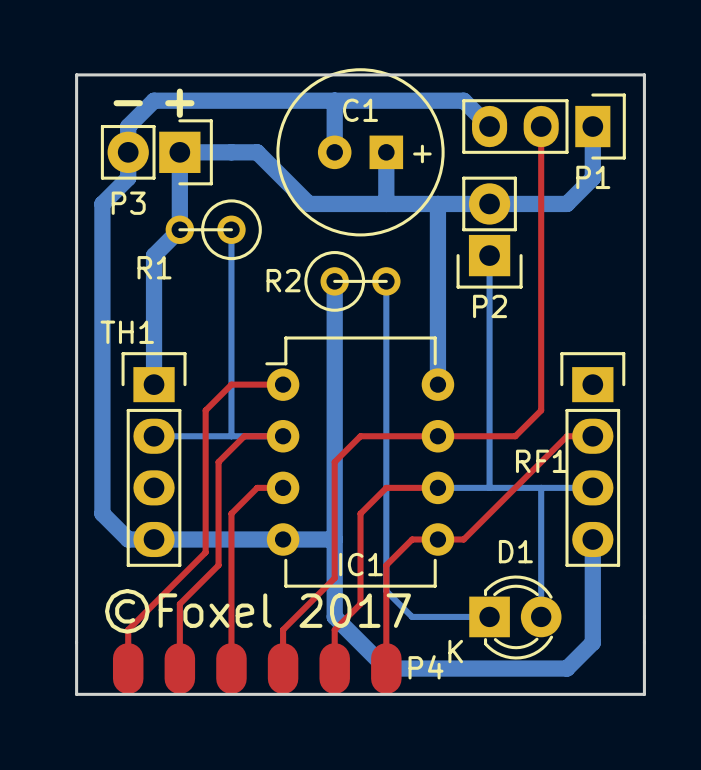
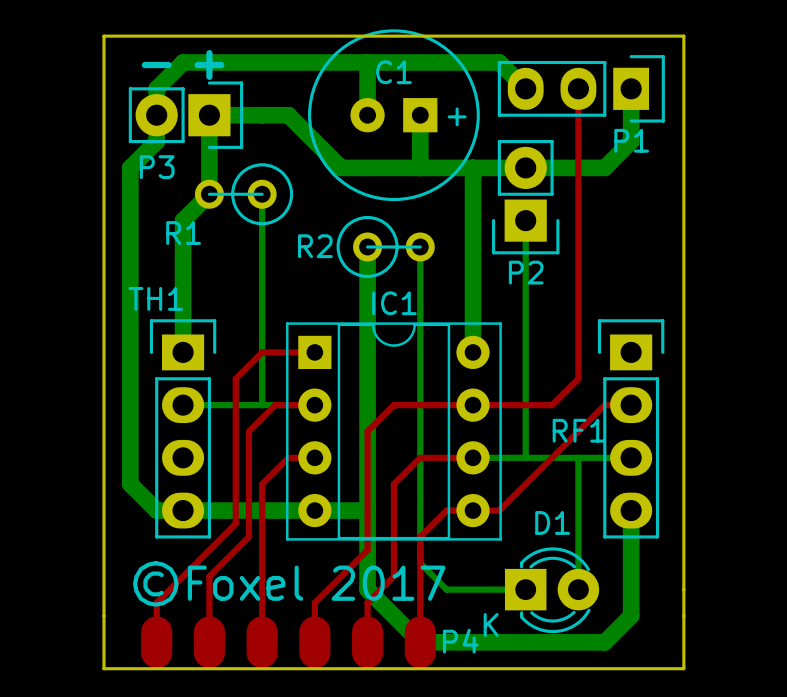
IC1 footprint: [265, 336, 455, 588] -> [286, 322, 502, 541]
IC1 name position: IC1 (361, 564) -> IC1 (394, 303)

